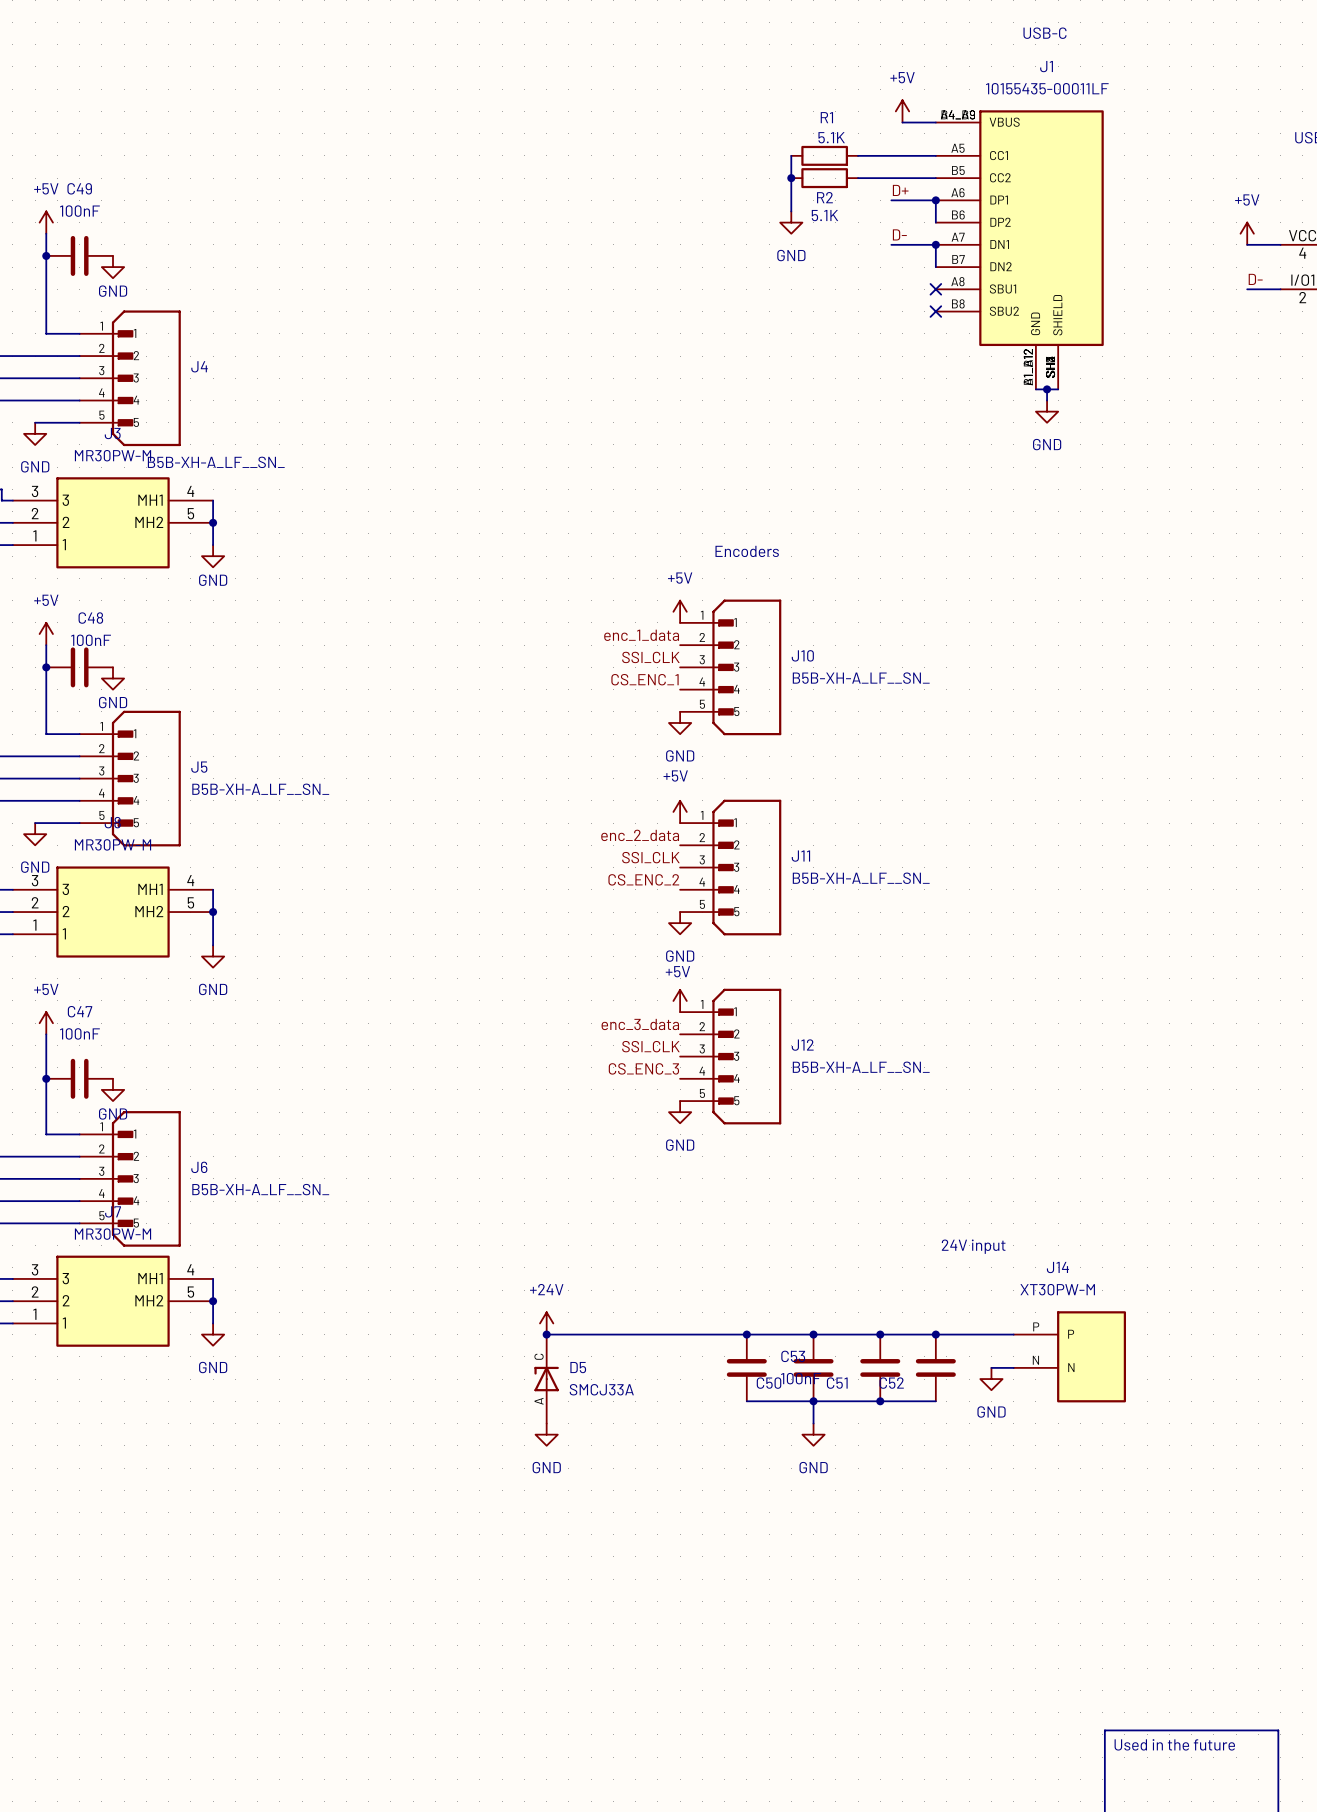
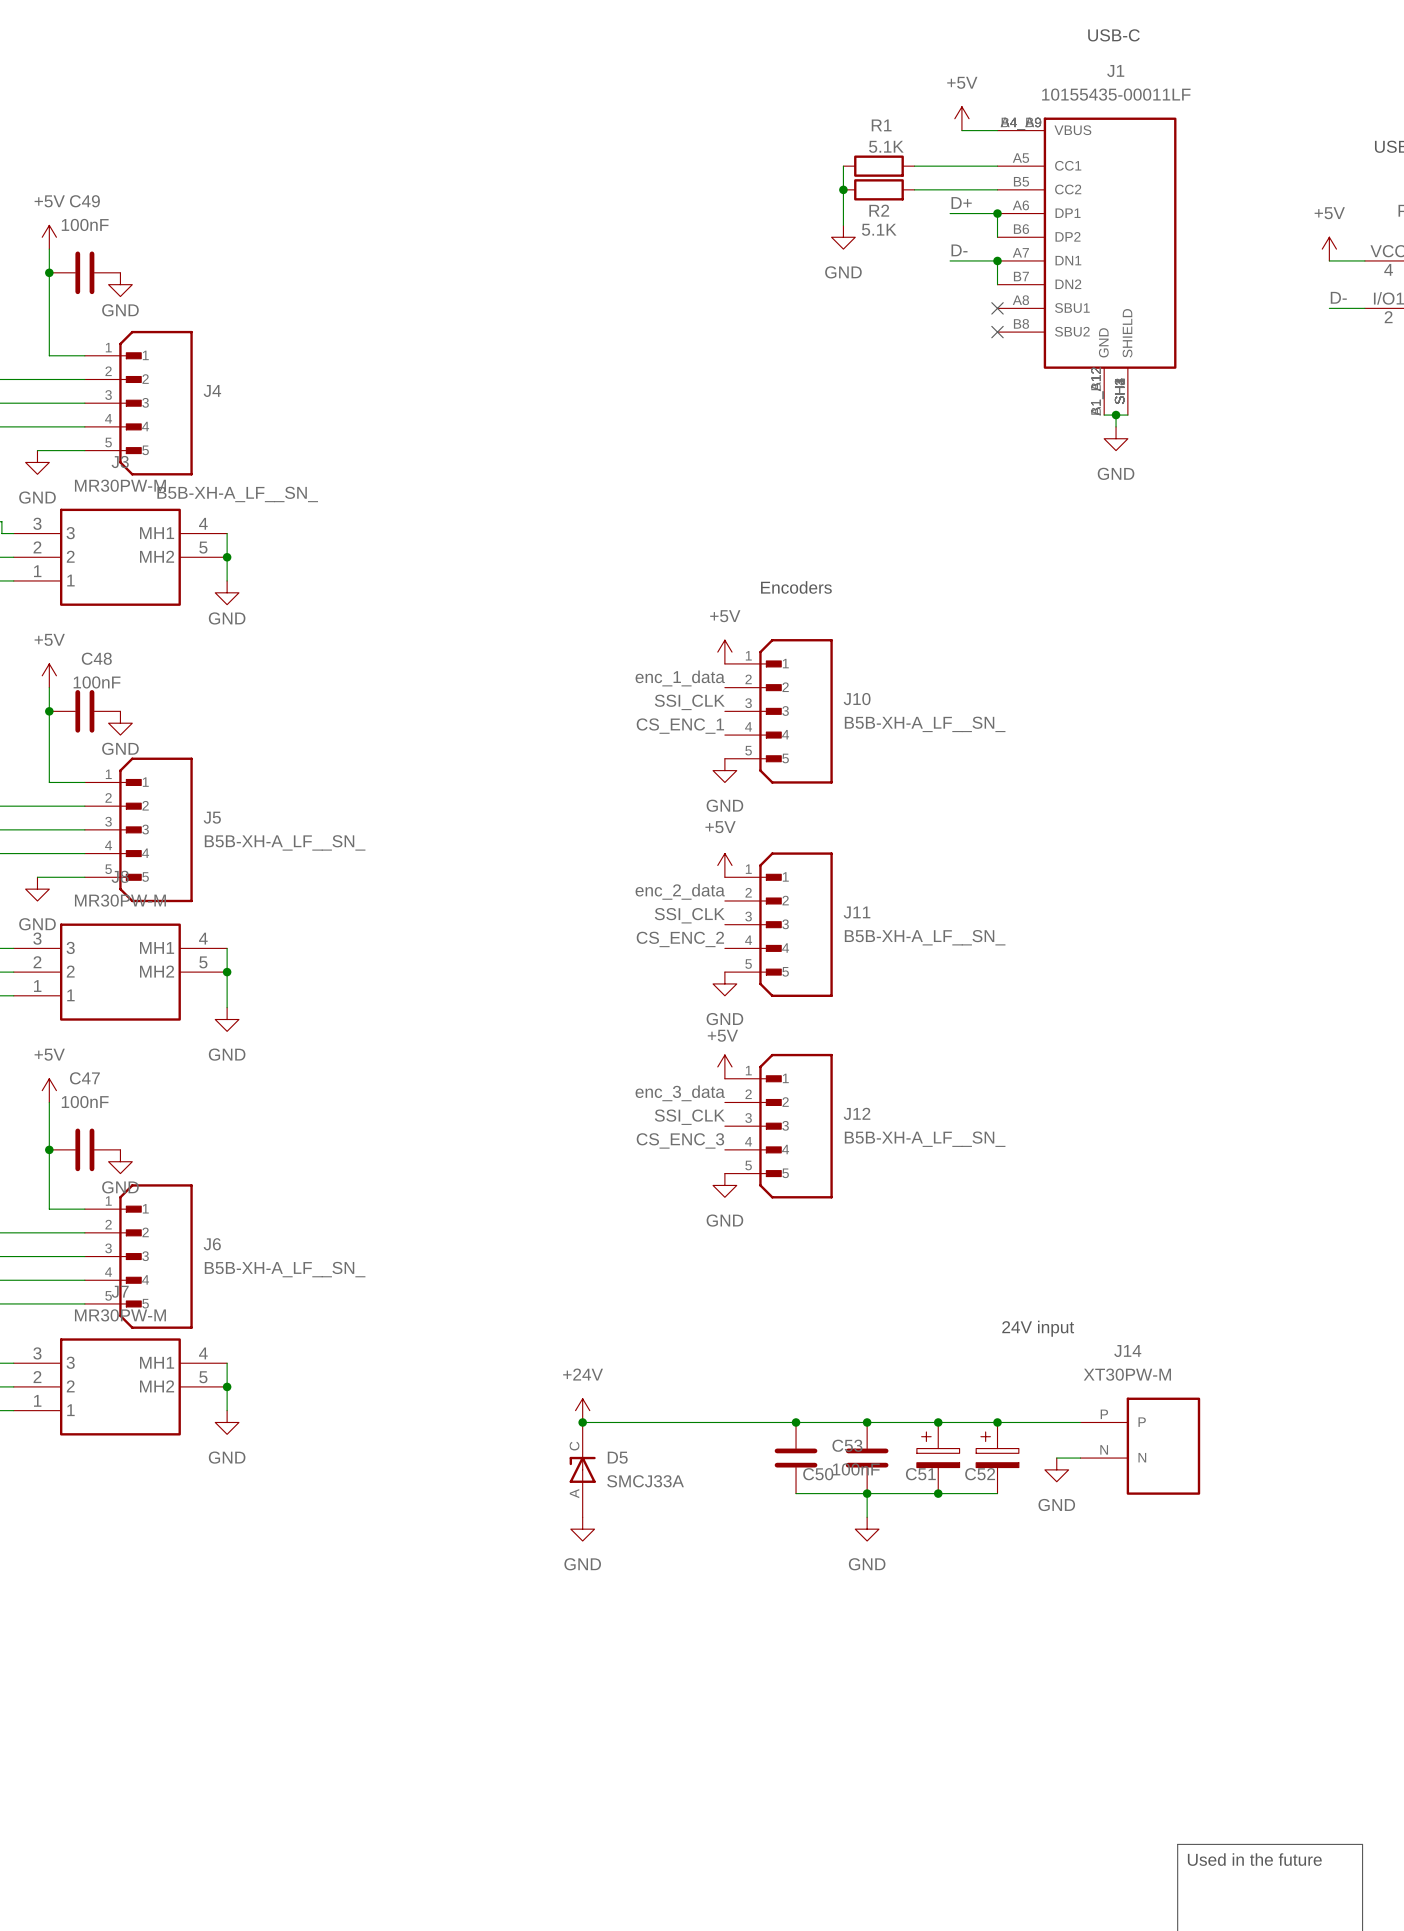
C51 symbol: [860, 1334, 901, 1402] -> [916, 1422, 960, 1494]
C52 symbol: [915, 1334, 956, 1402] -> [976, 1422, 1019, 1494]
C51 name position: C51 (837, 1383) -> C51 (920, 1474)
C52 name position: C52 (891, 1383) -> C52 (980, 1474)

